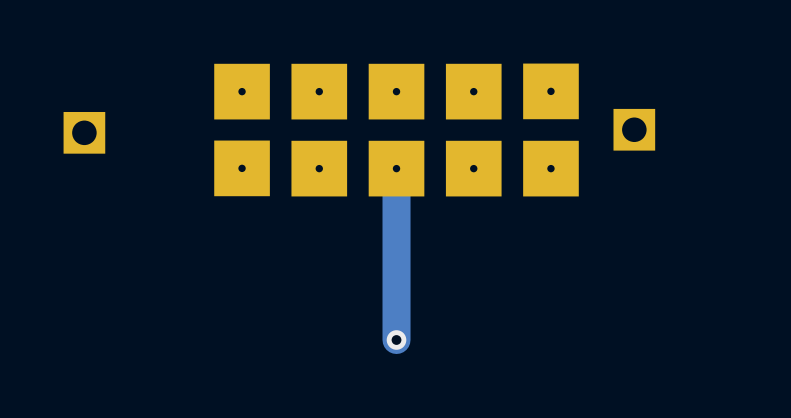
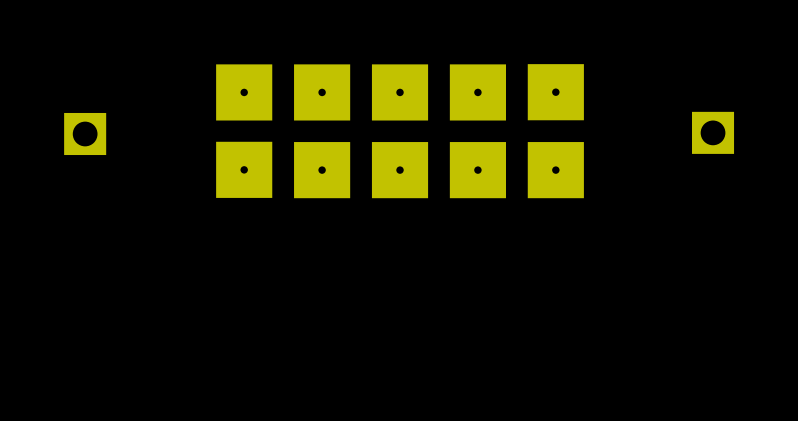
part position: (634, 129) -> (713, 132)
track: (396, 168) (396, 340) -> none
via: (396, 340) -> none

